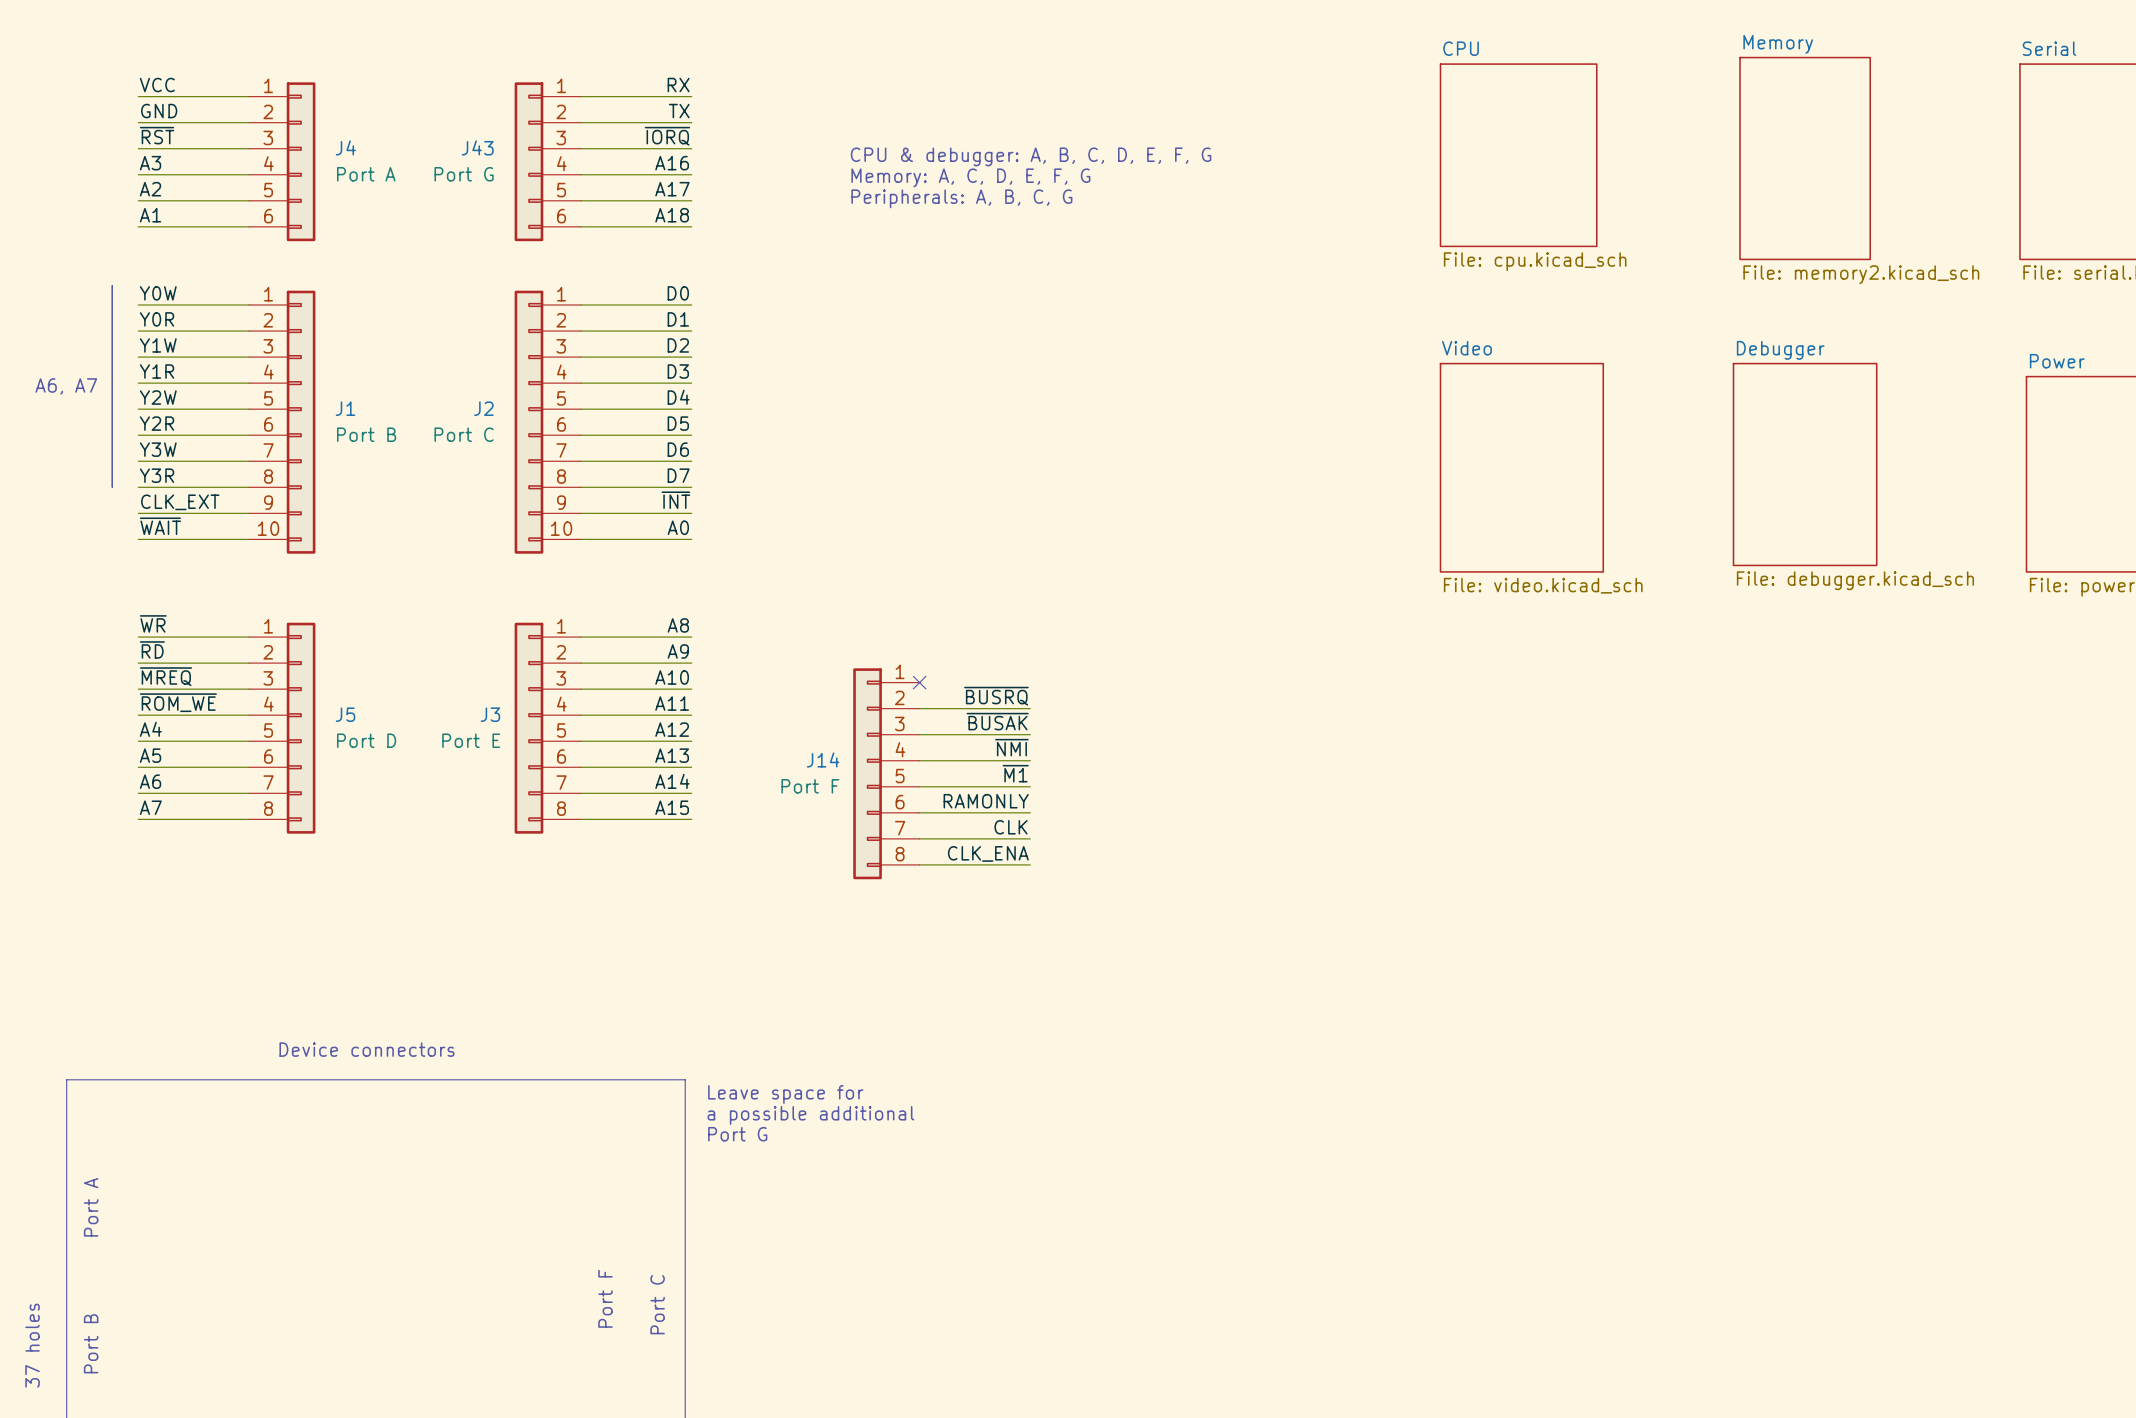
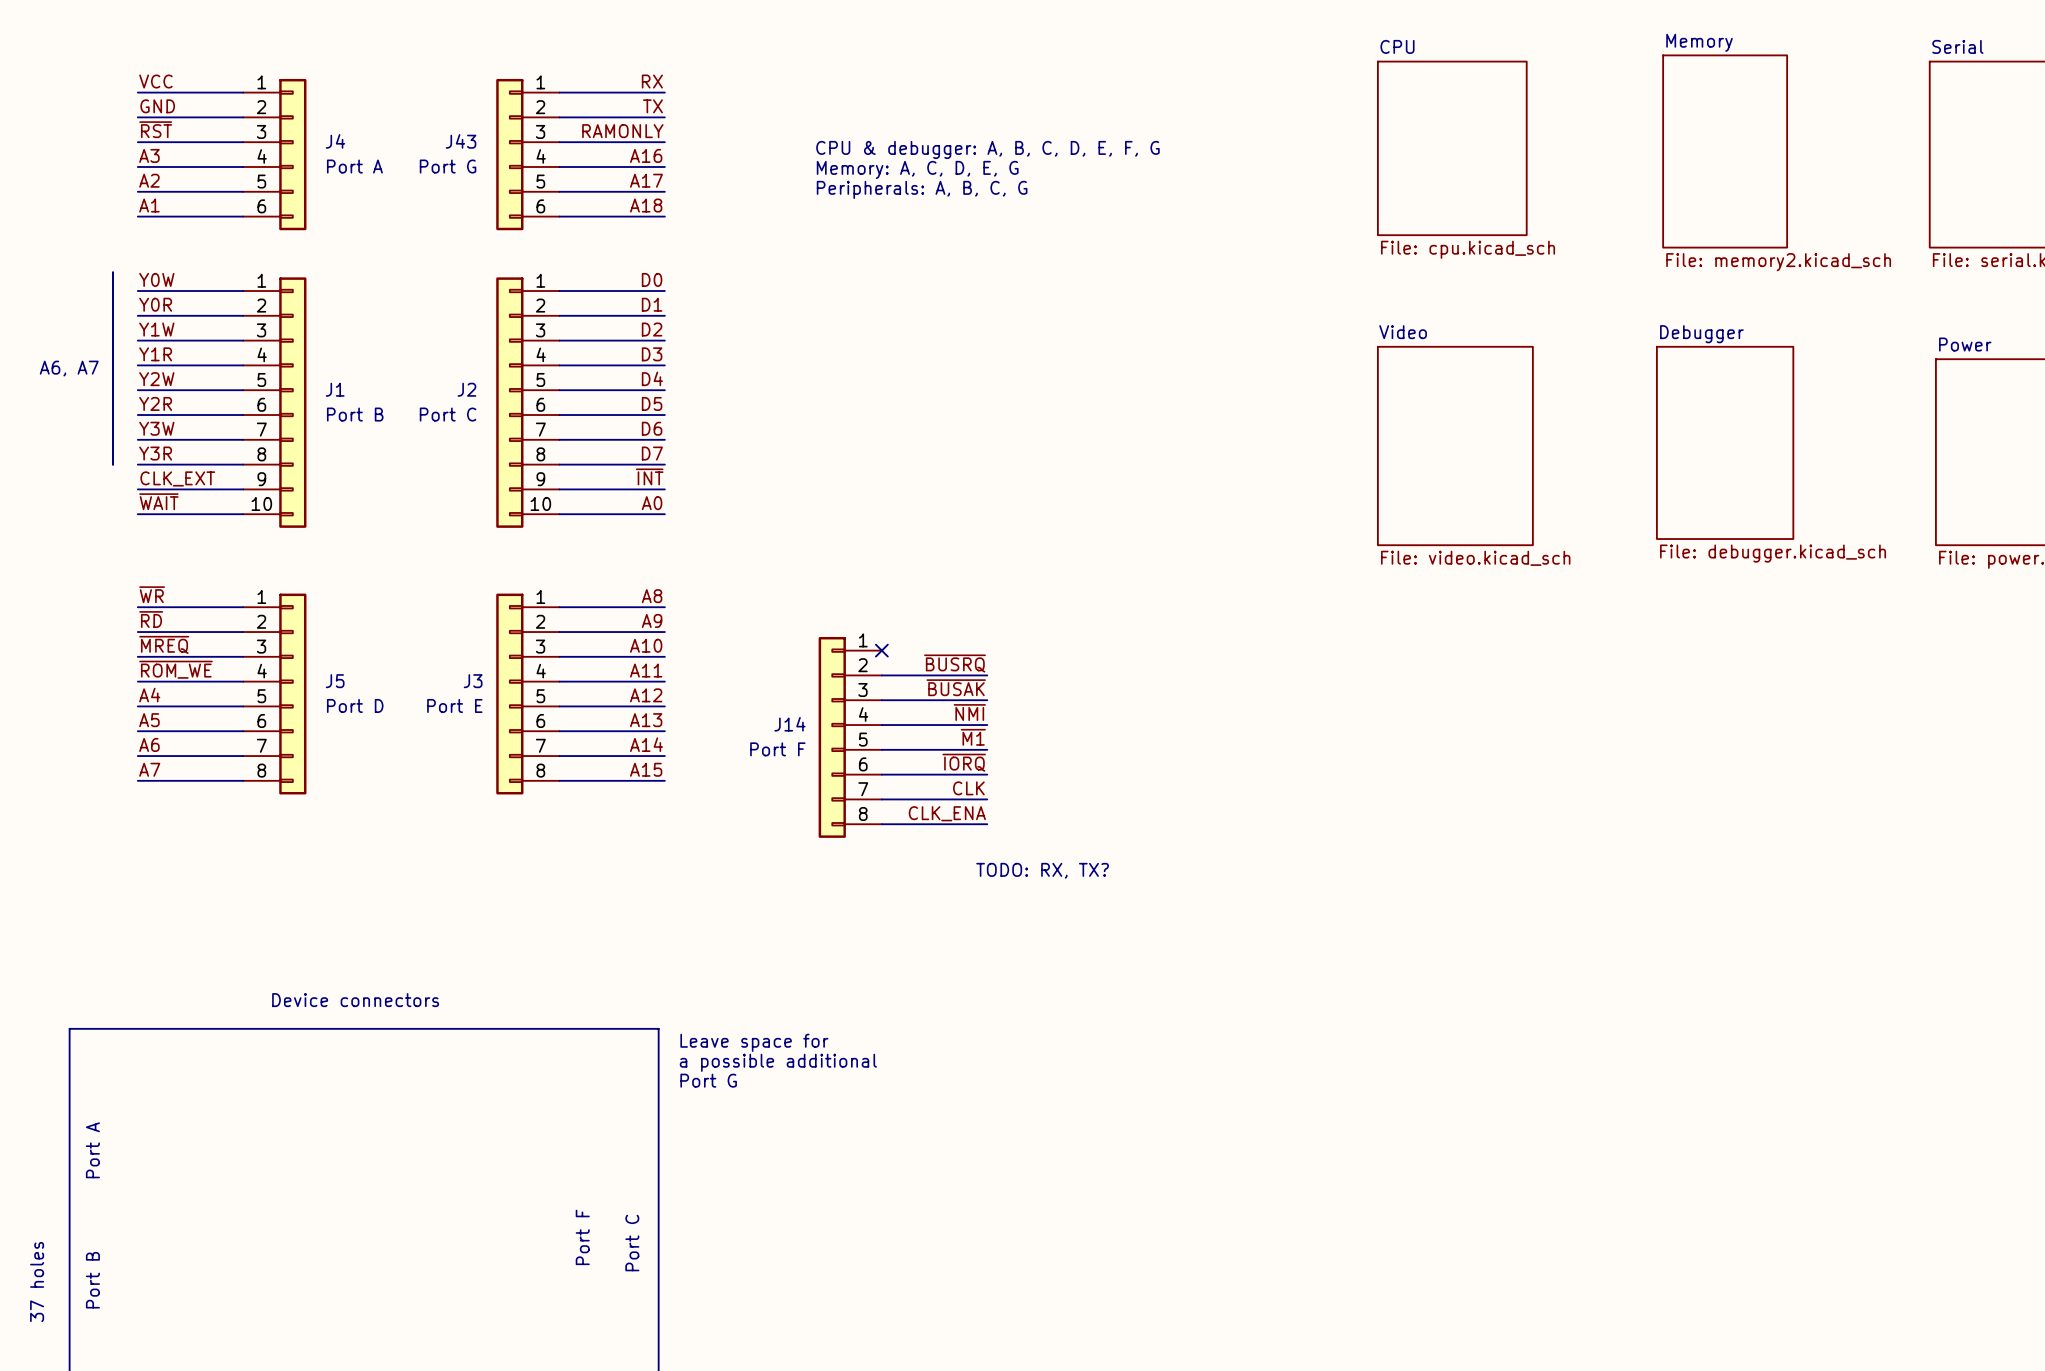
label: ~{IORQ} (667, 136) -> RAMONLY (622, 131)
text: Memory: A, C, D, E, F, G (970, 177) -> Memory: A, C, D, E, G (917, 169)
label: RAMONLY (986, 801) -> ~{IORQ} (964, 762)
text: none -> TODO: RX, TX? (1042, 870)

